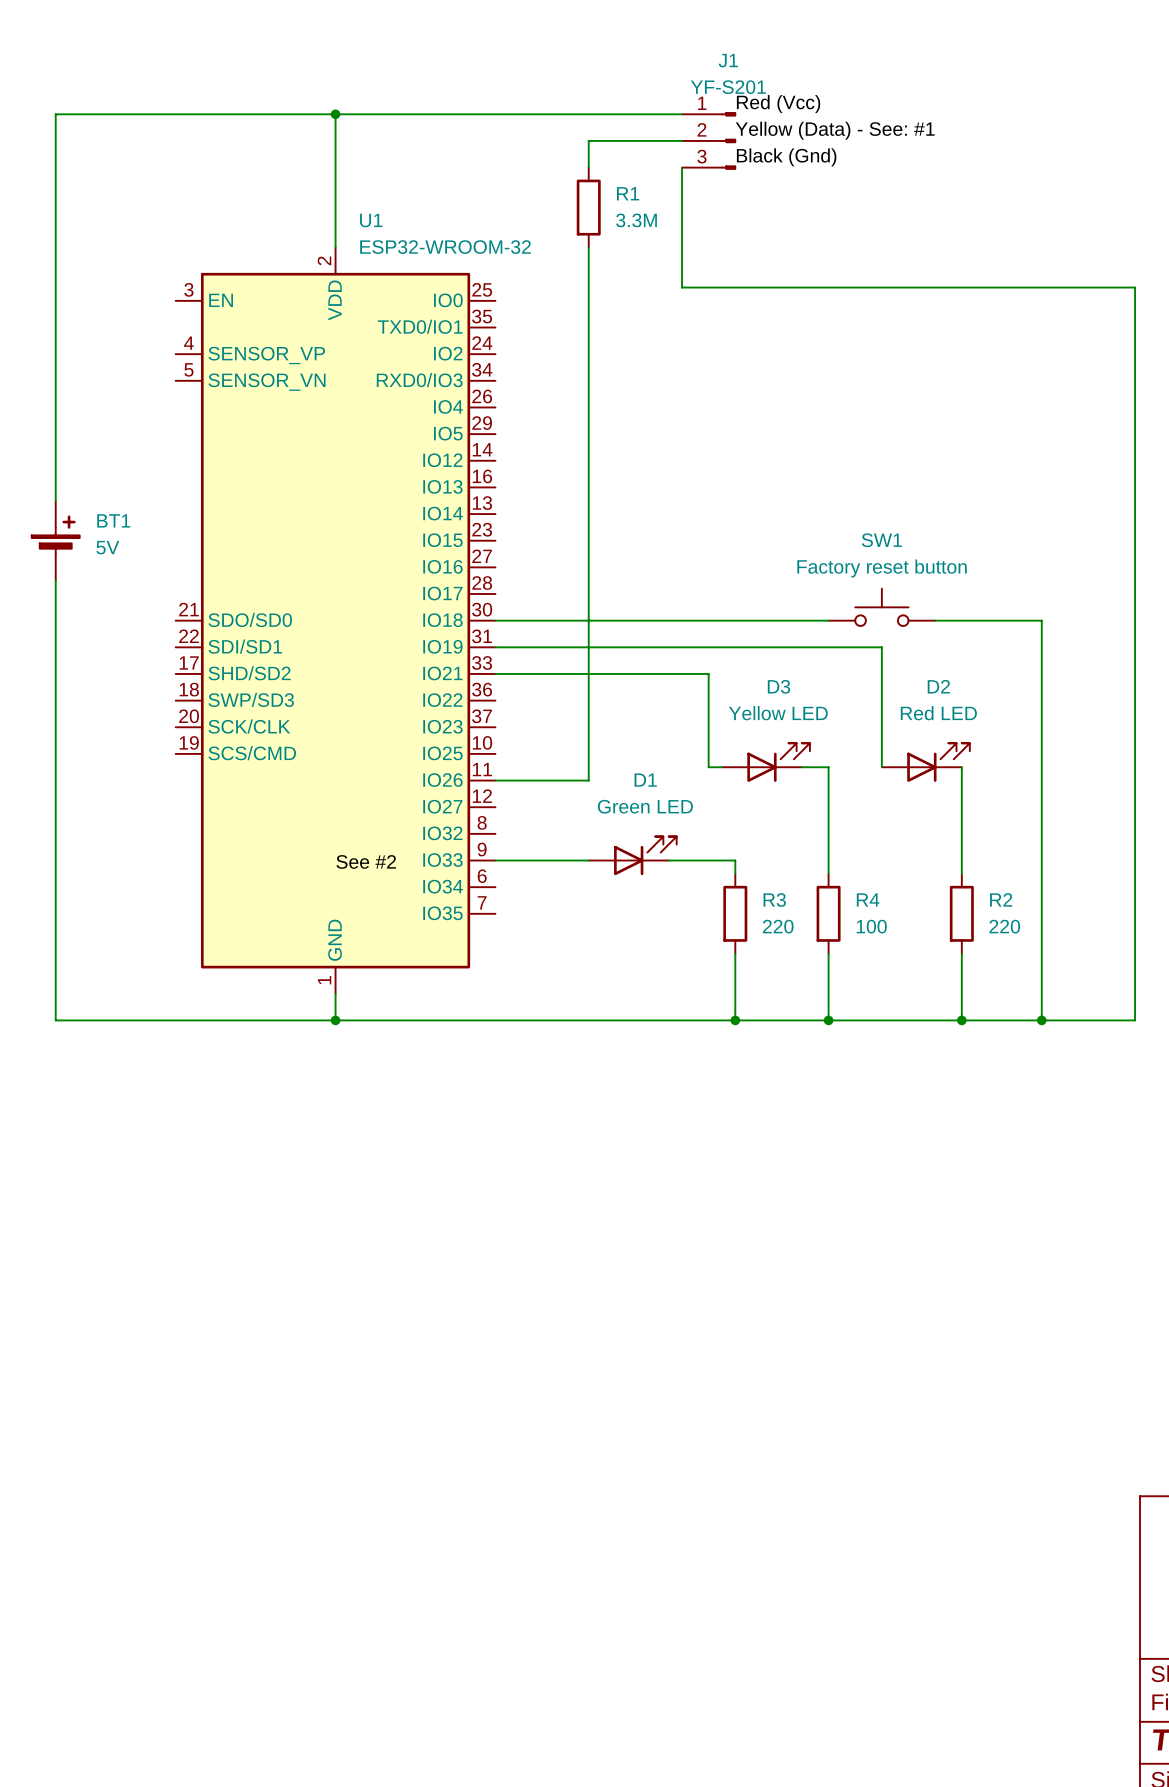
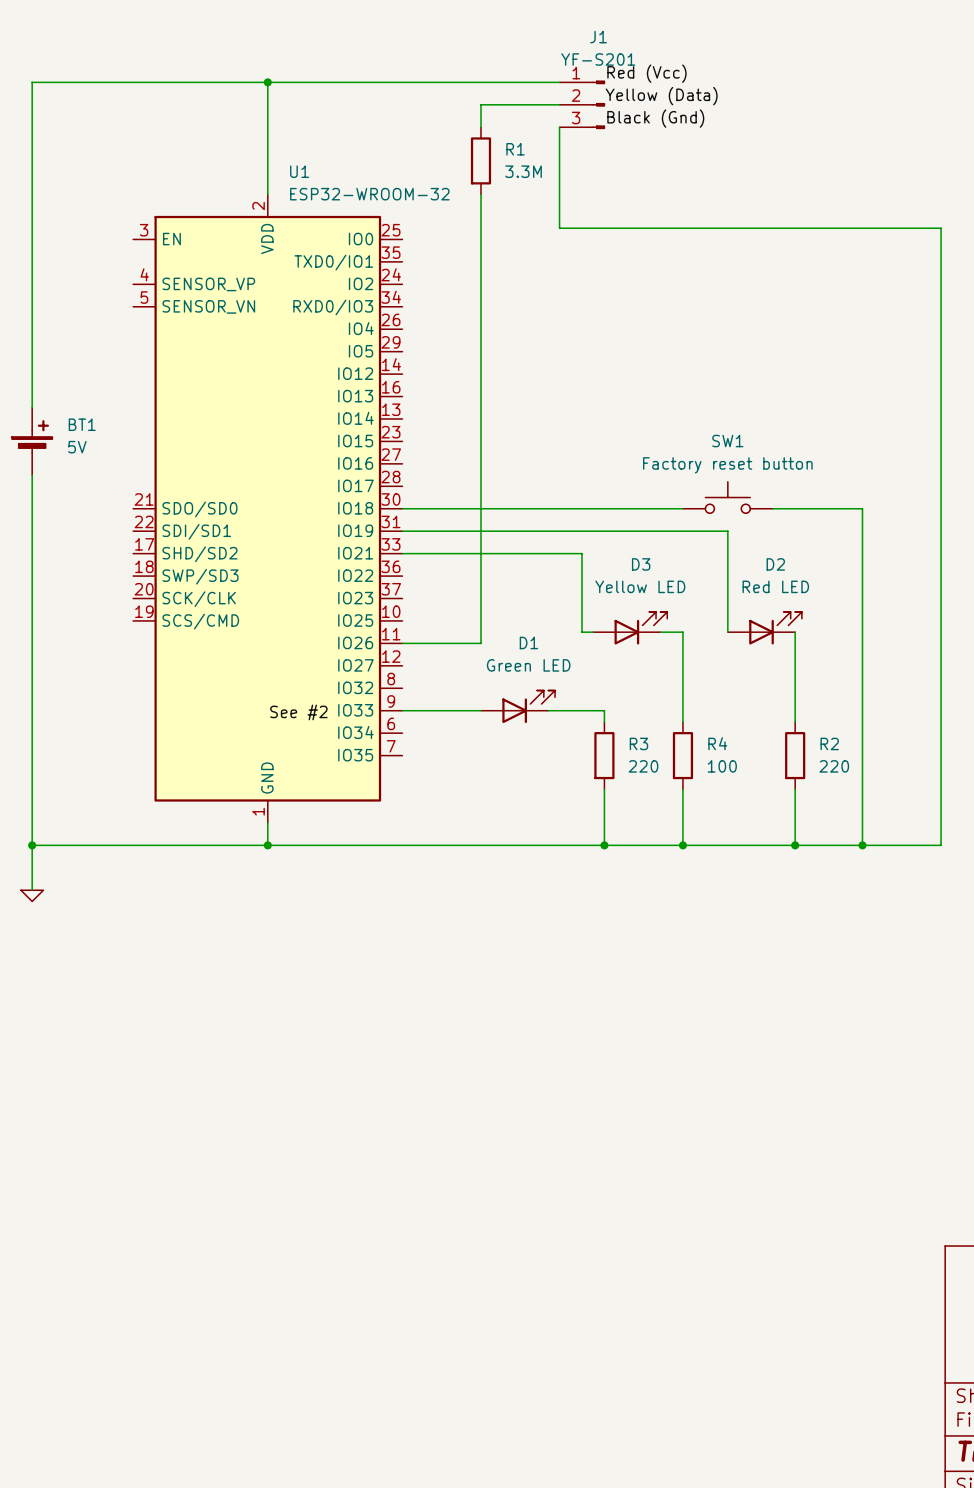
label: Yellow (Data) - See: #1 (835, 130) -> Yellow (Data) (661, 96)
wire: none -> (32, 845) (32, 890)
junction: none -> (32, 845)
power symbol: none -> (32, 895)

